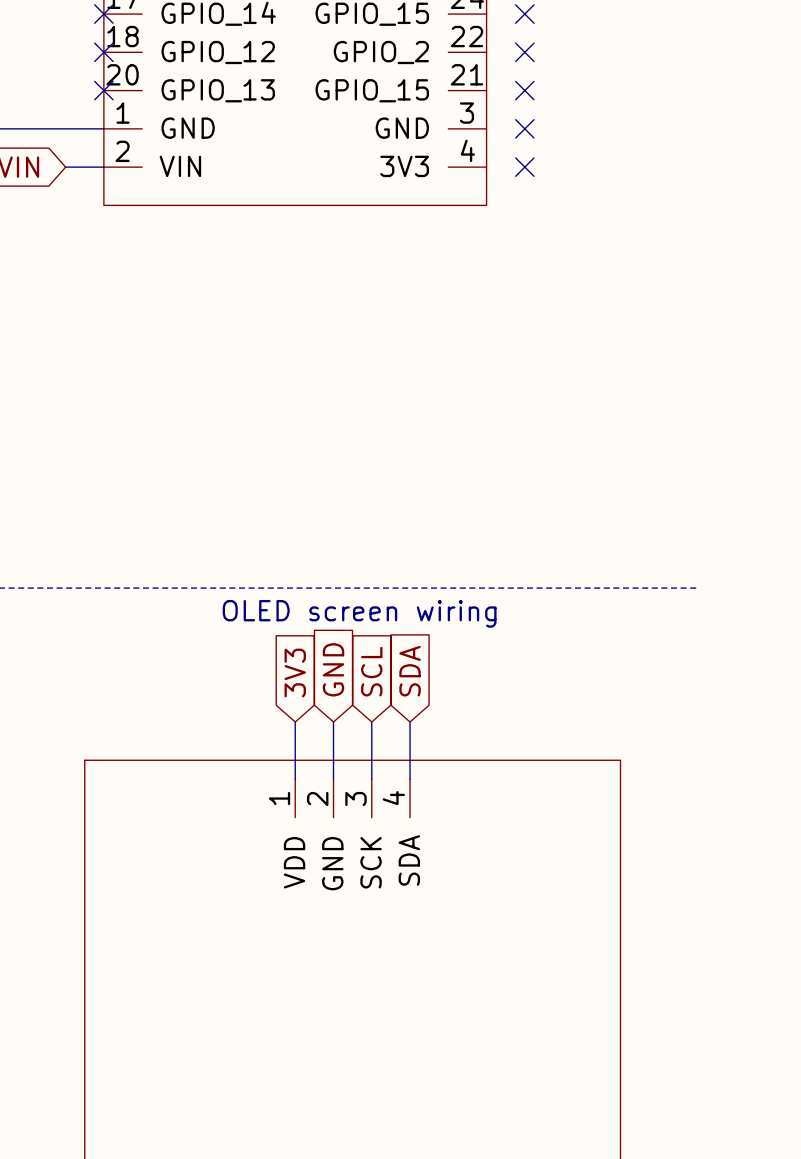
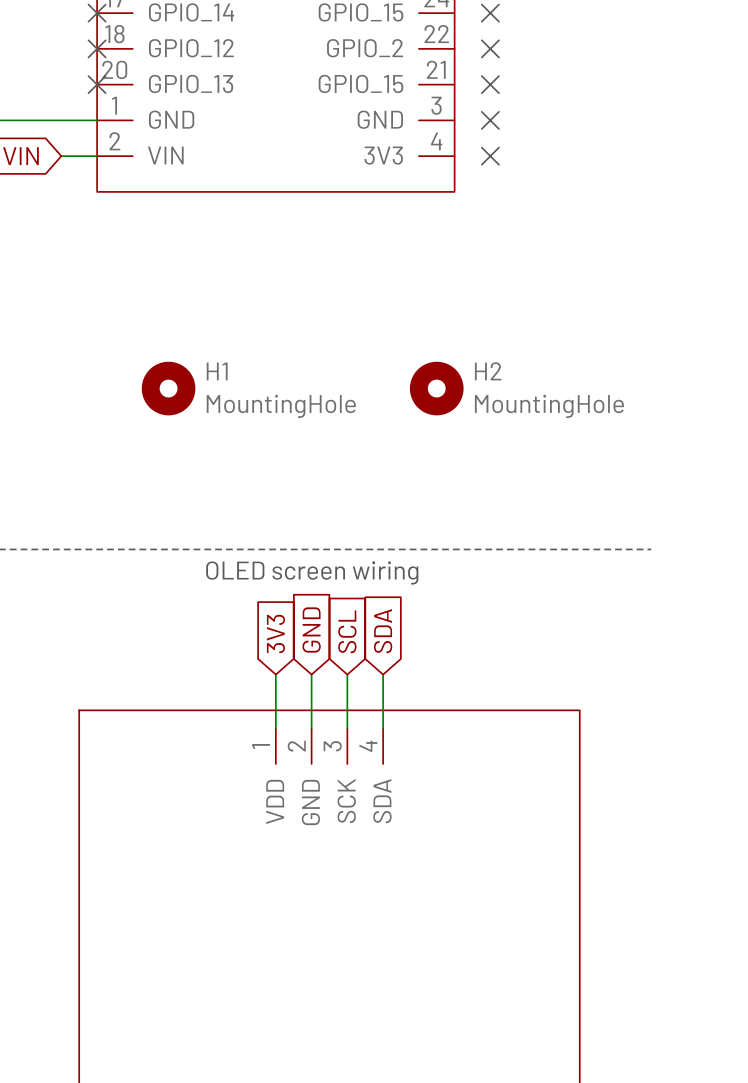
H1: none -> MountingHole (168, 388)
H2: none -> MountingHole (436, 388)

